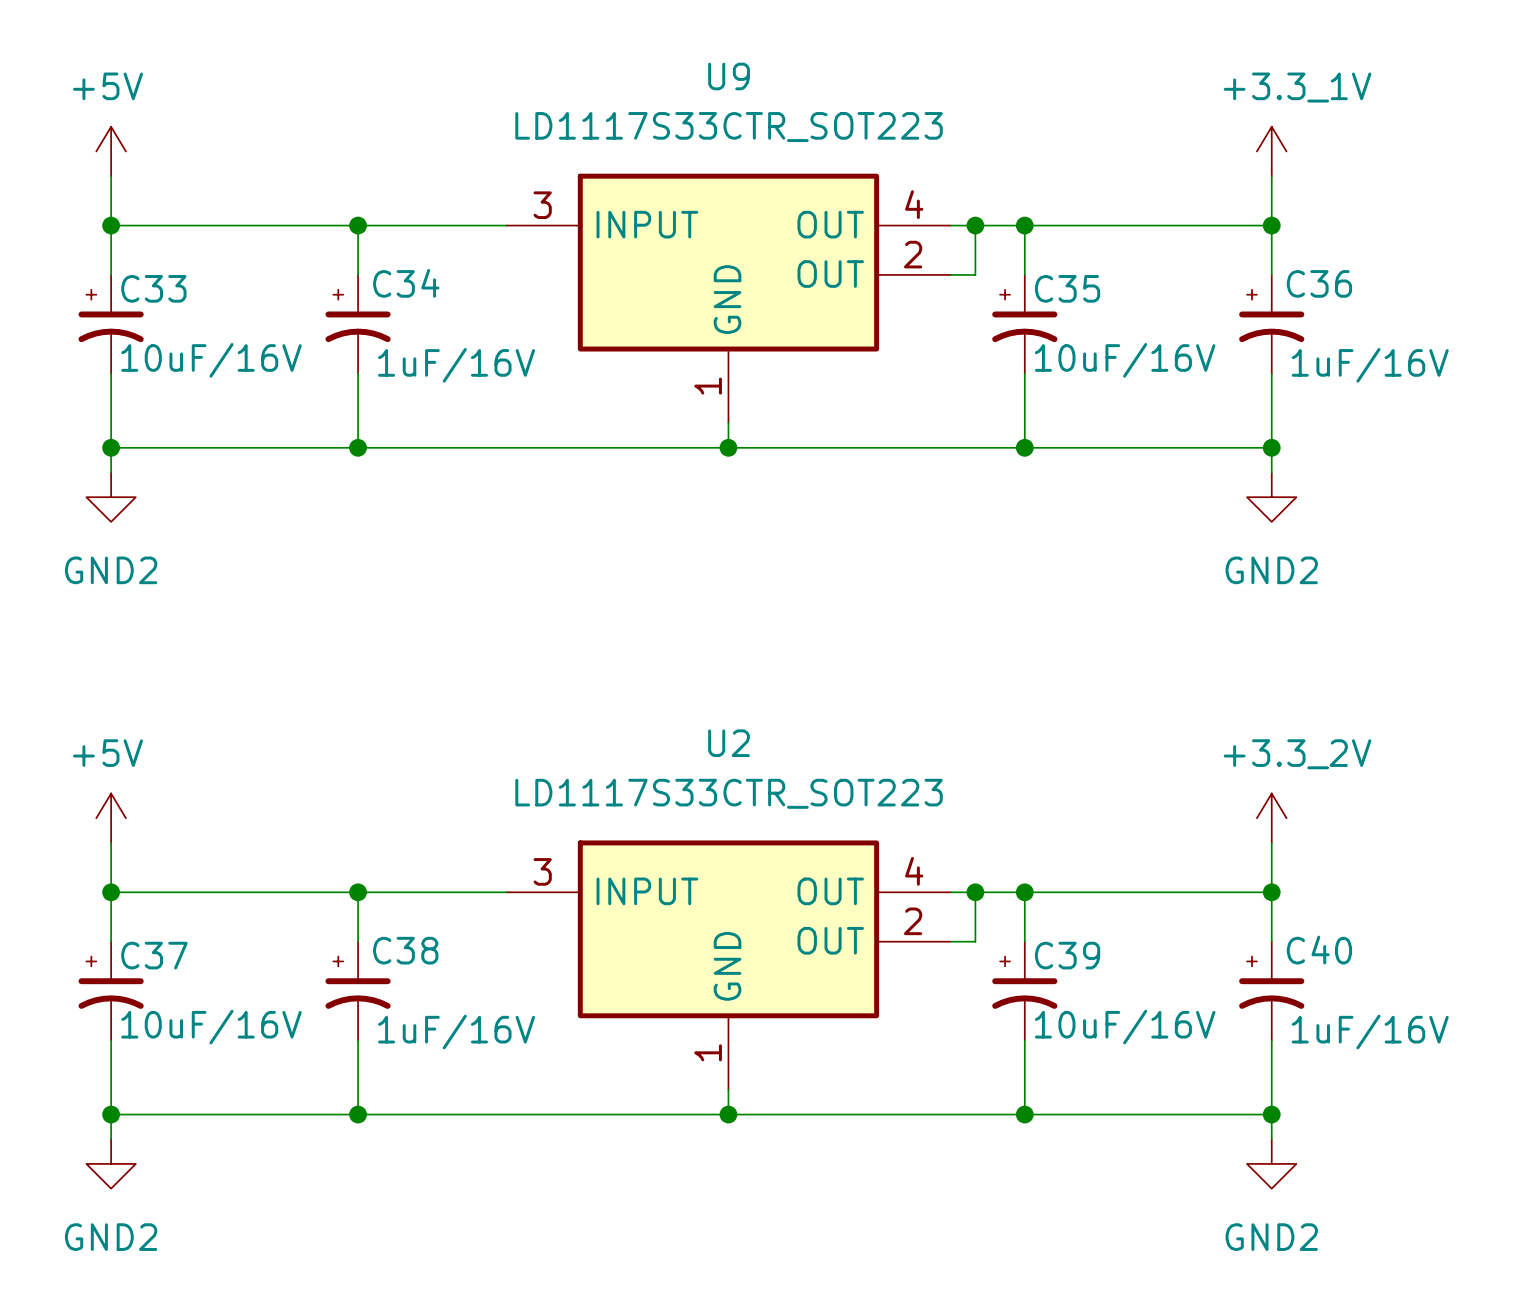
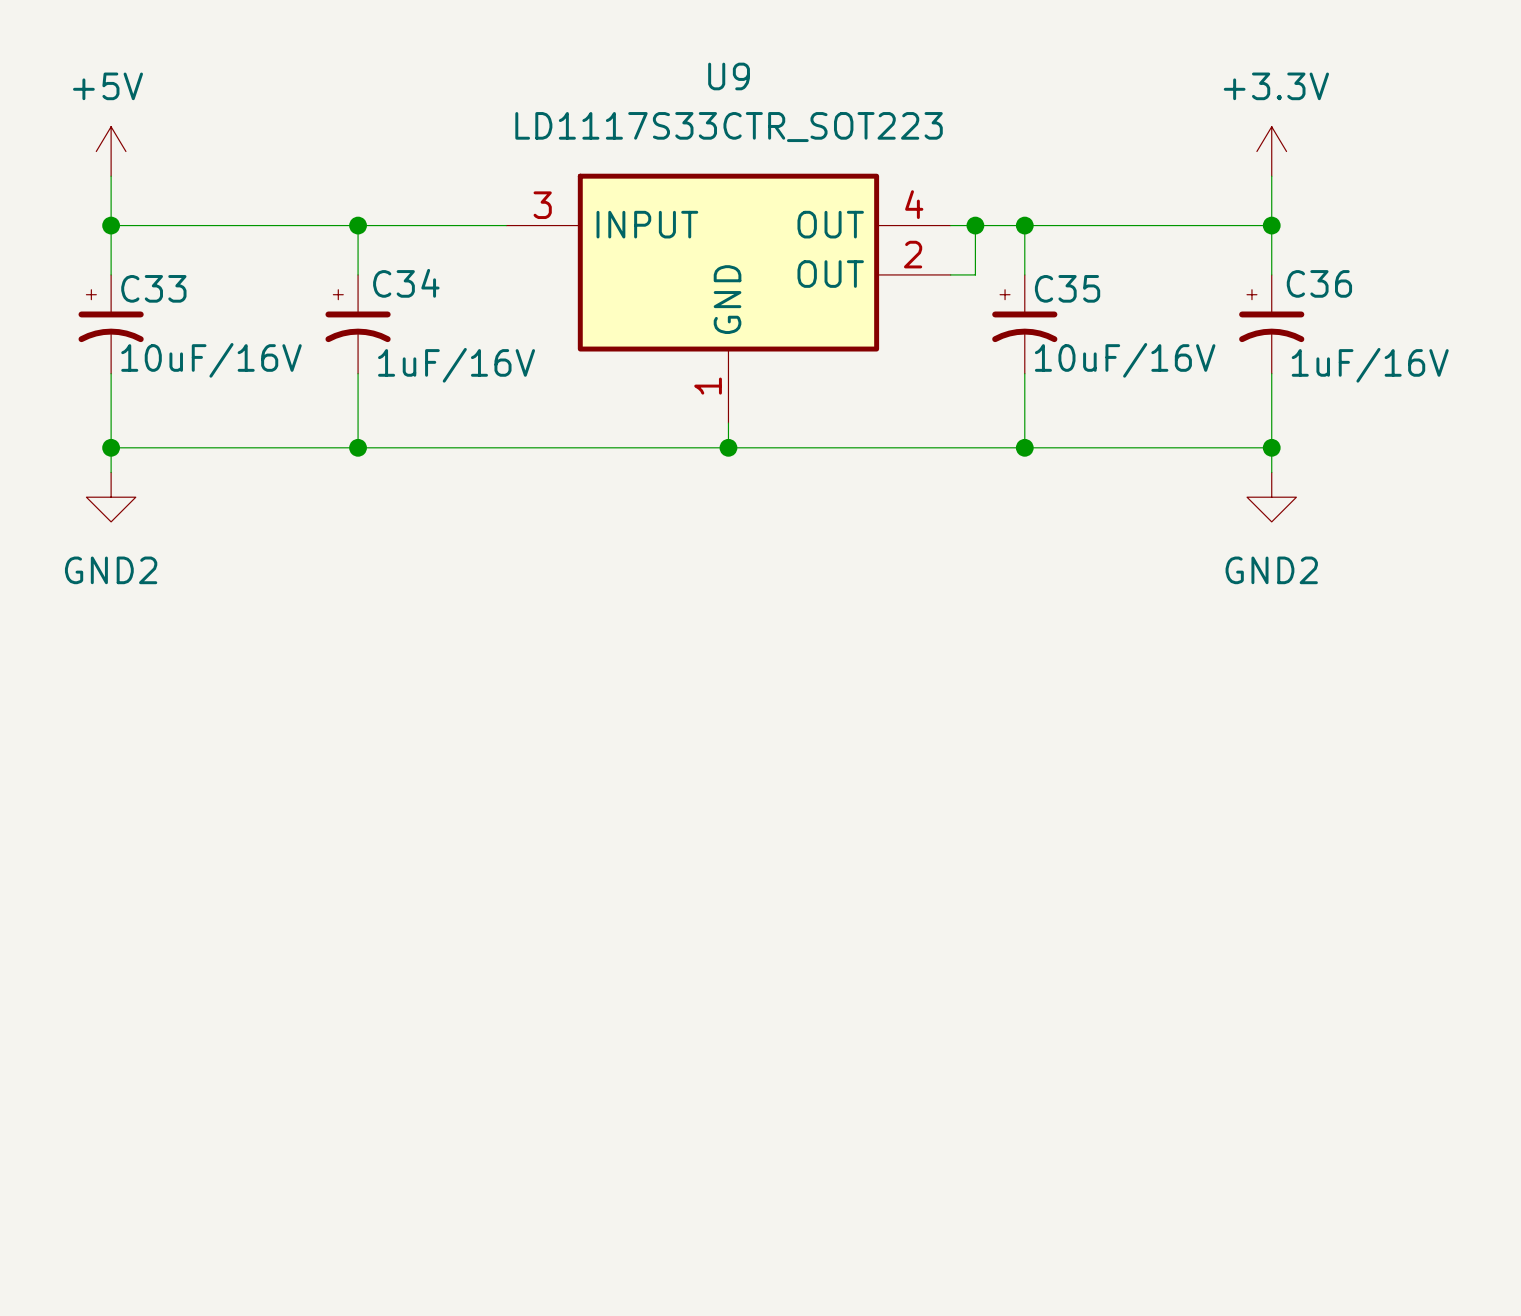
power symbol: +3.3_1V (1271, 151) -> +3.3V (1271, 151)
power symbol: +5V (111, 818) -> none
power symbol: +3.3_2V (1271, 818) -> none
wire: (111, 842) (111, 941) -> none
wire: (1271, 842) (1271, 941) -> none
wire: (111, 892) (506, 892) -> none
junction: (111, 892) -> none
wire: (358, 892) (358, 941) -> none
junction: (358, 892) -> none
wire: (950, 892) (1271, 892) -> none
wire: (975, 892) (975, 941) (950, 941) -> none
junction: (975, 892) -> none
wire: (1024, 892) (1024, 941) -> none
junction: (1024, 892) -> none
junction: (1271, 892) -> none
U2: LD1117S33CTR_SOT223 (728, 965) -> none
C37: 10uF/16V (111, 991) -> none
C38: 1uF/16V (358, 991) -> none
C39: 10uF/16V (1024, 991) -> none
C40: 1uF/16V (1271, 991) -> none
wire: (111, 1040) (111, 1139) -> none
wire: (358, 1040) (358, 1114) -> none
wire: (1024, 1040) (1024, 1114) -> none
wire: (1271, 1040) (1271, 1139) -> none
wire: (728, 1089) (728, 1114) -> none
wire: (111, 1114) (1271, 1114) -> none
junction: (111, 1114) -> none
junction: (358, 1114) -> none
junction: (728, 1114) -> none
junction: (1024, 1114) -> none
junction: (1271, 1114) -> none
power symbol: GND2 (111, 1163) -> none
power symbol: GND2 (1271, 1163) -> none

